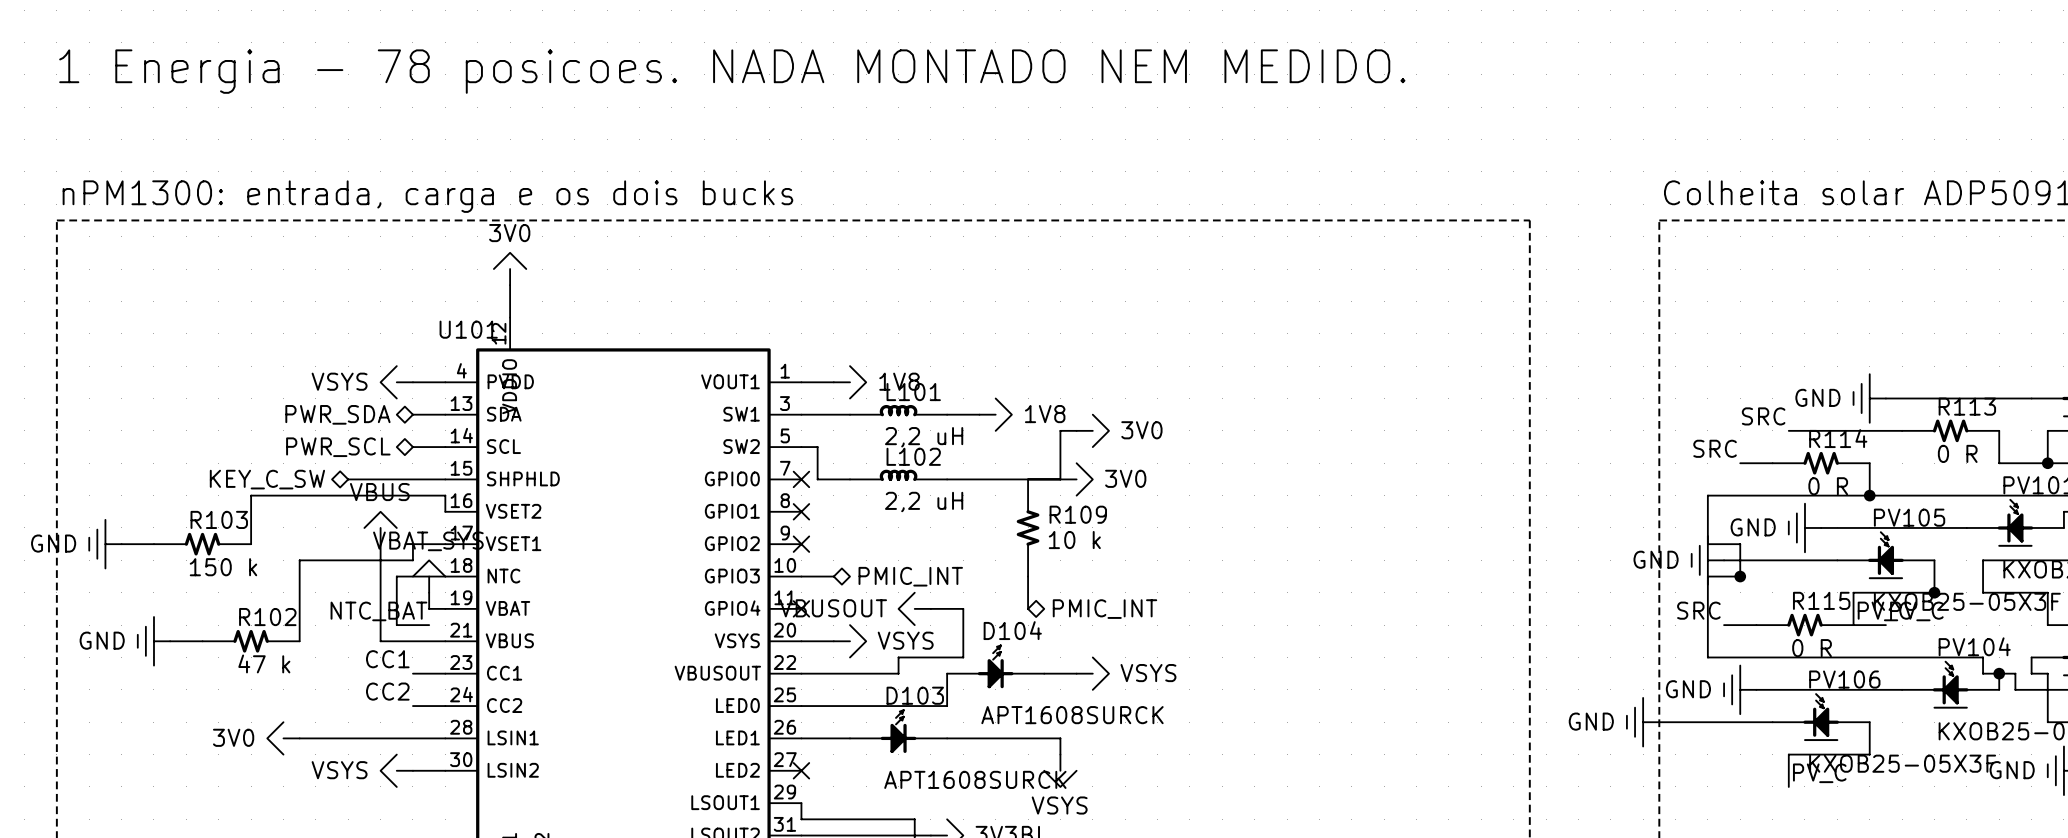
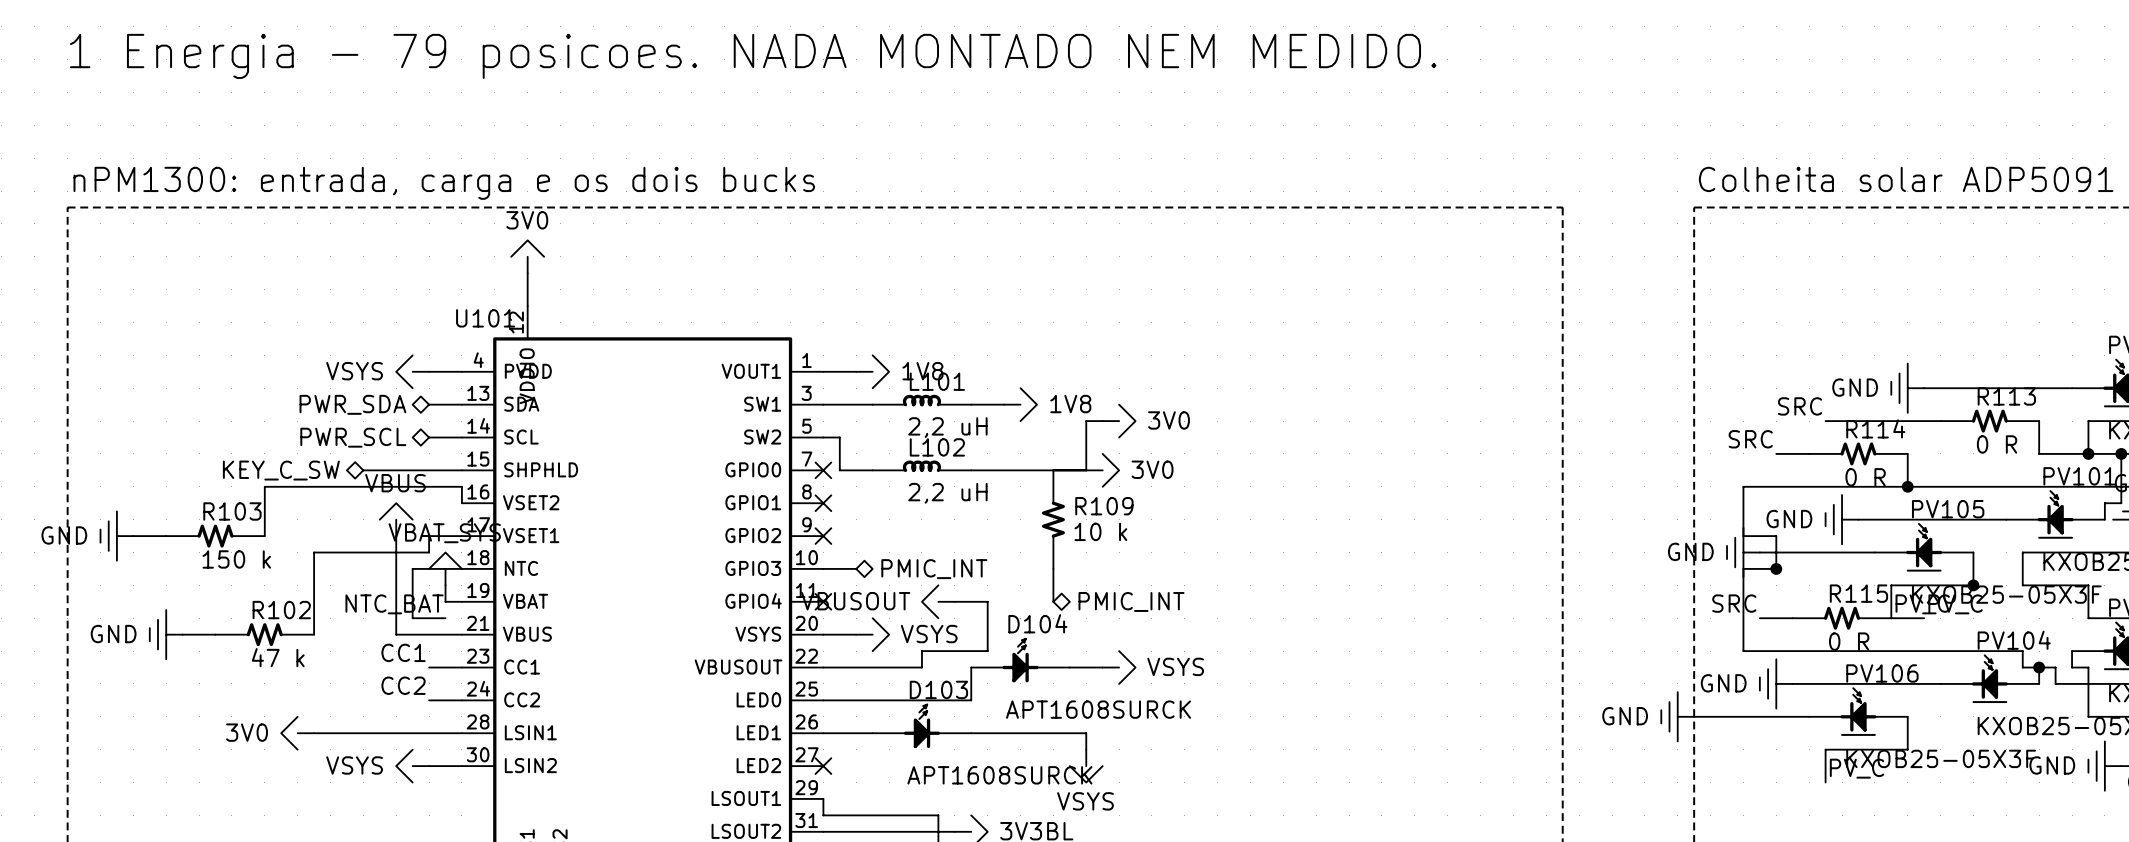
text: 1 Energia - 78 posicoes. NADA MONTADO NEM MEDIDO. (732, 71) -> 1 Energia - 79 posicoes. NADA MONTADO NEM MEDIDO. (753, 56)

